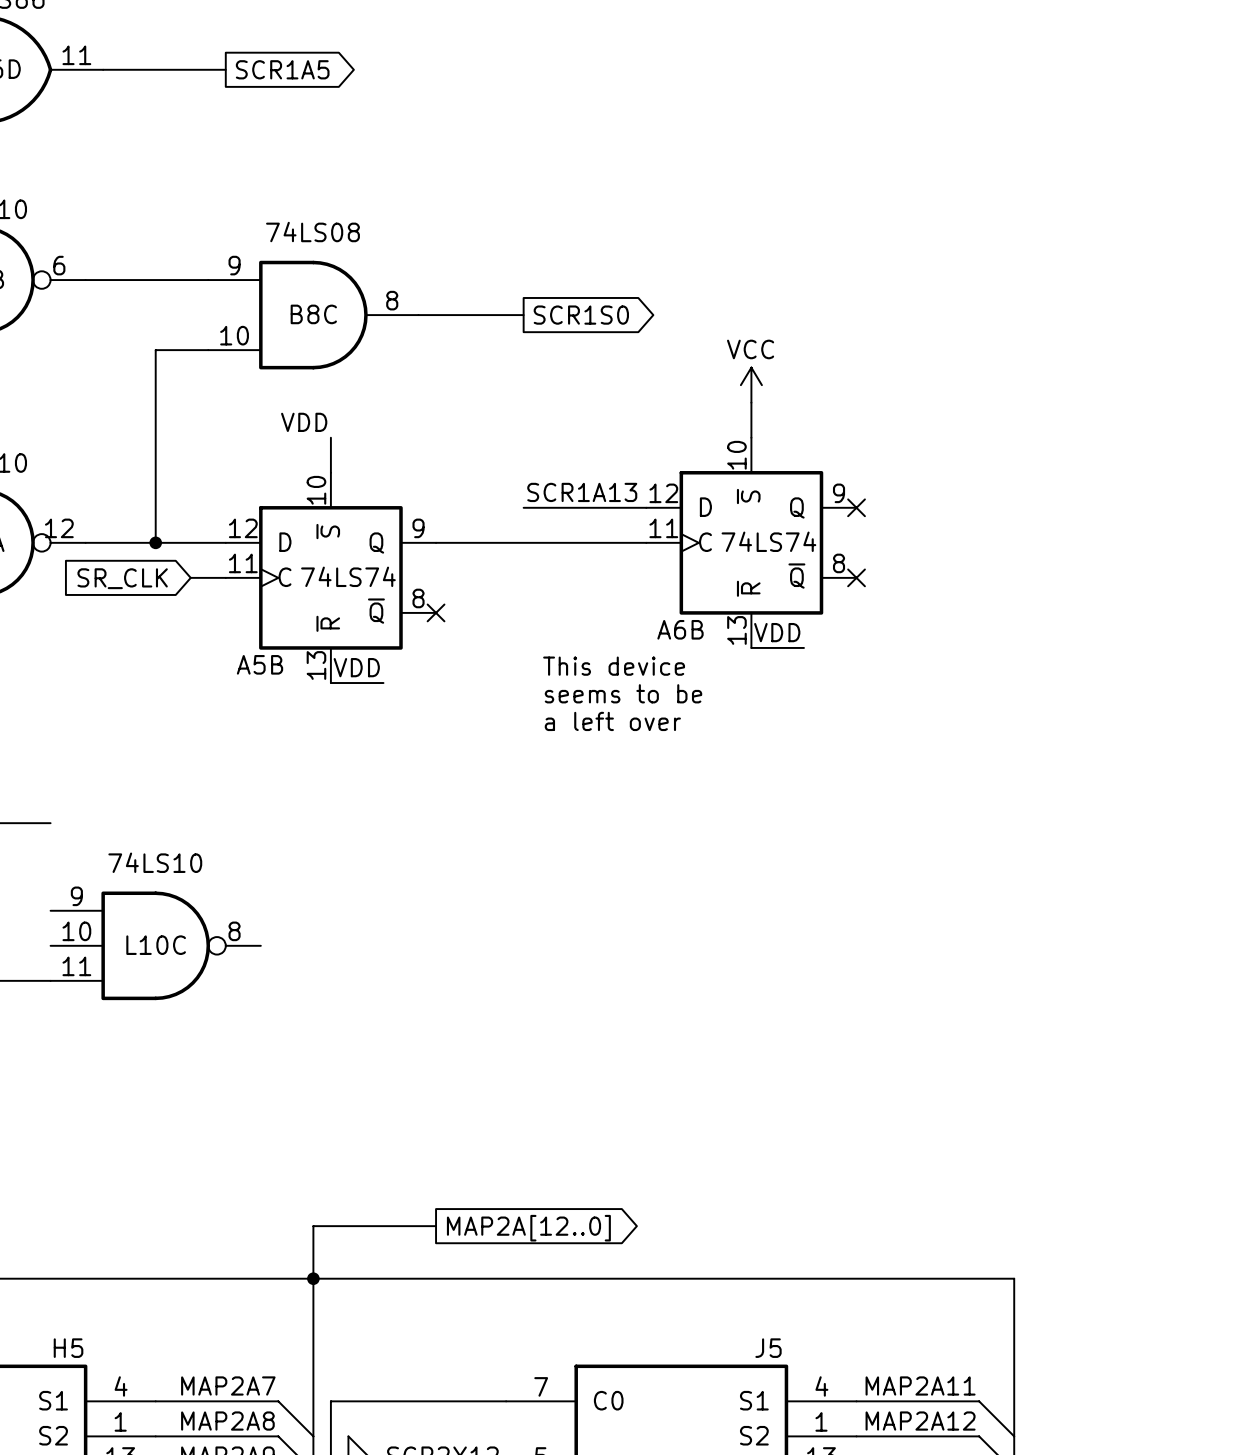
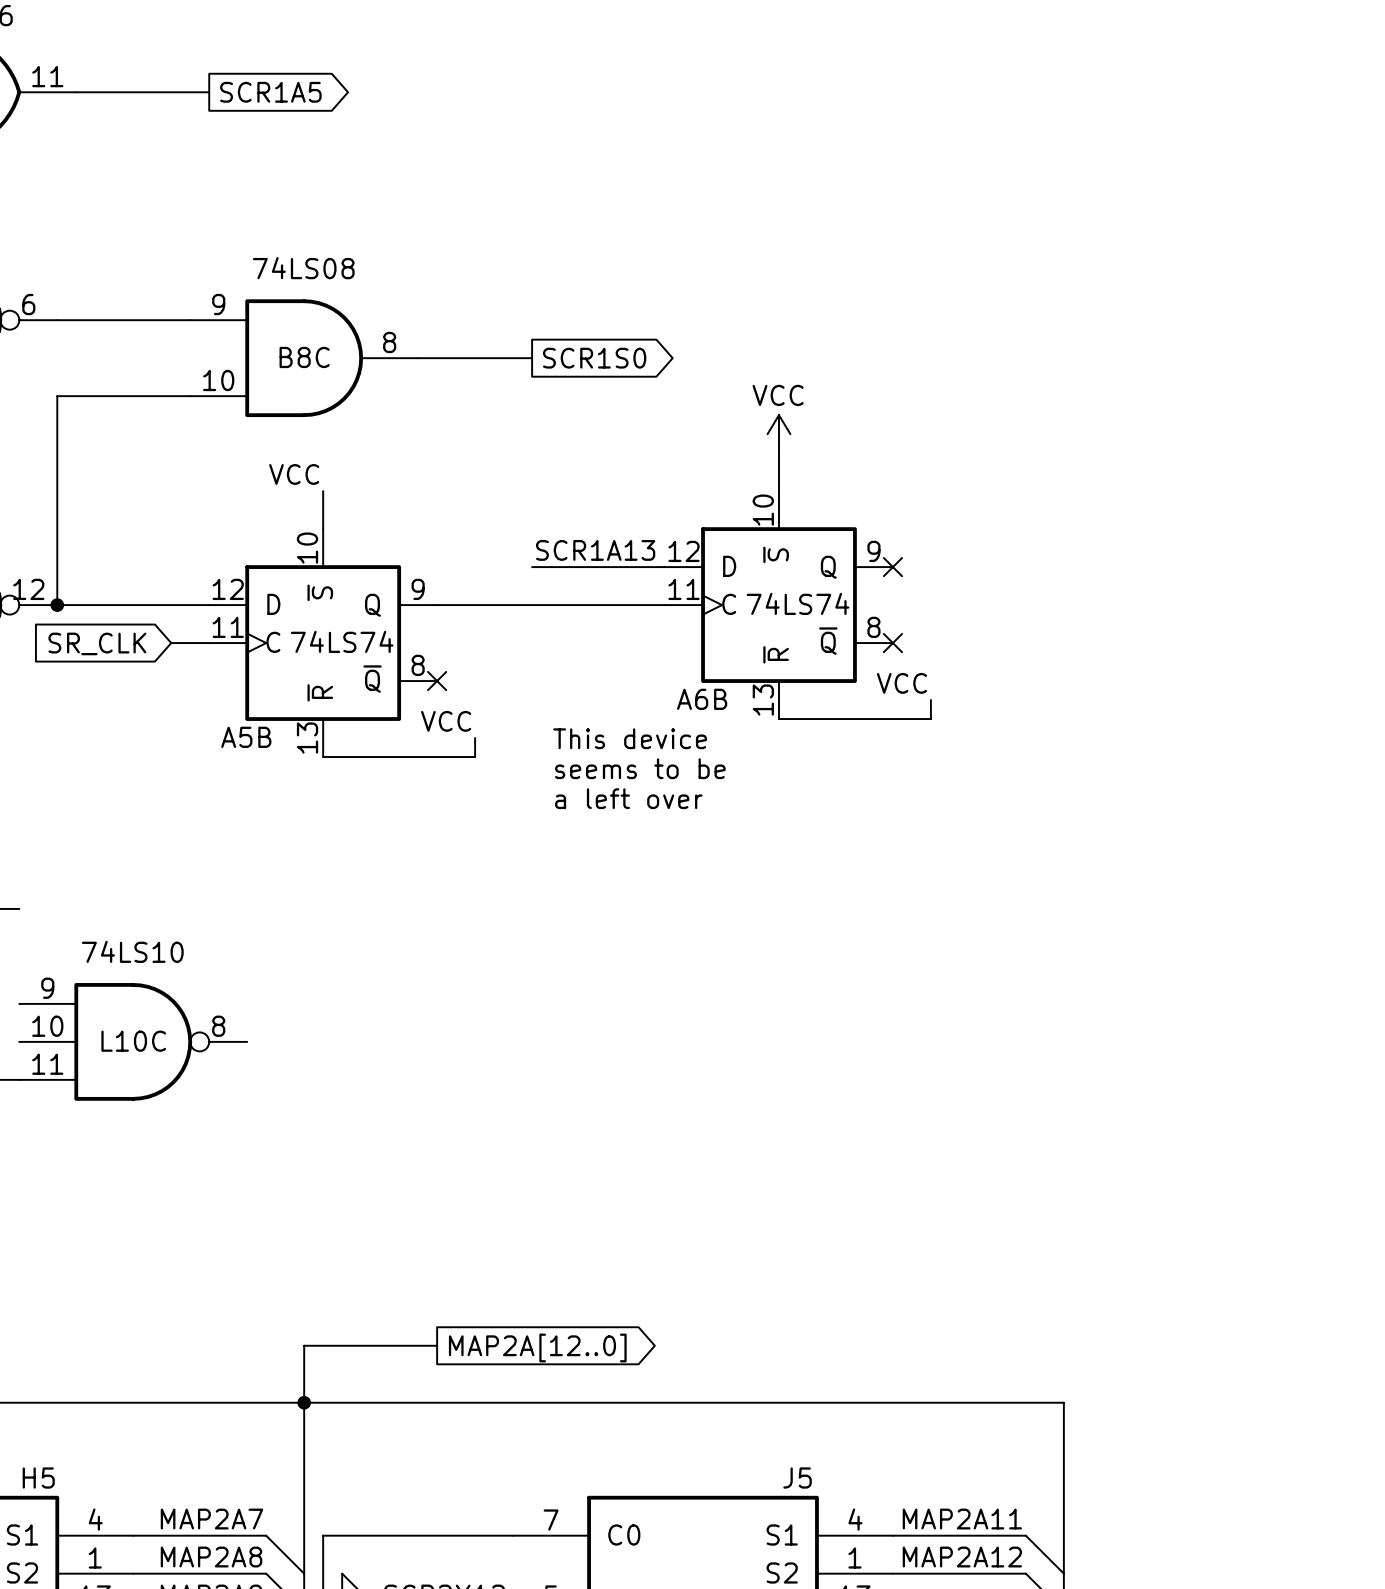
wire: (155, 350) (155, 542) -> (133, 396) (57, 396) (57, 605)
label: VDD (304, 422) -> VCC (294, 474)
junction position: (155, 542) -> (57, 605)
label: none -> VCC (901, 683)
wire: none -> (930, 700) (930, 719) (835, 719)
label: VDD (777, 632) -> none
label: none -> VCC (446, 721)
wire: none -> (475, 738) (475, 757) (380, 757)
label: VDD (356, 667) -> none

